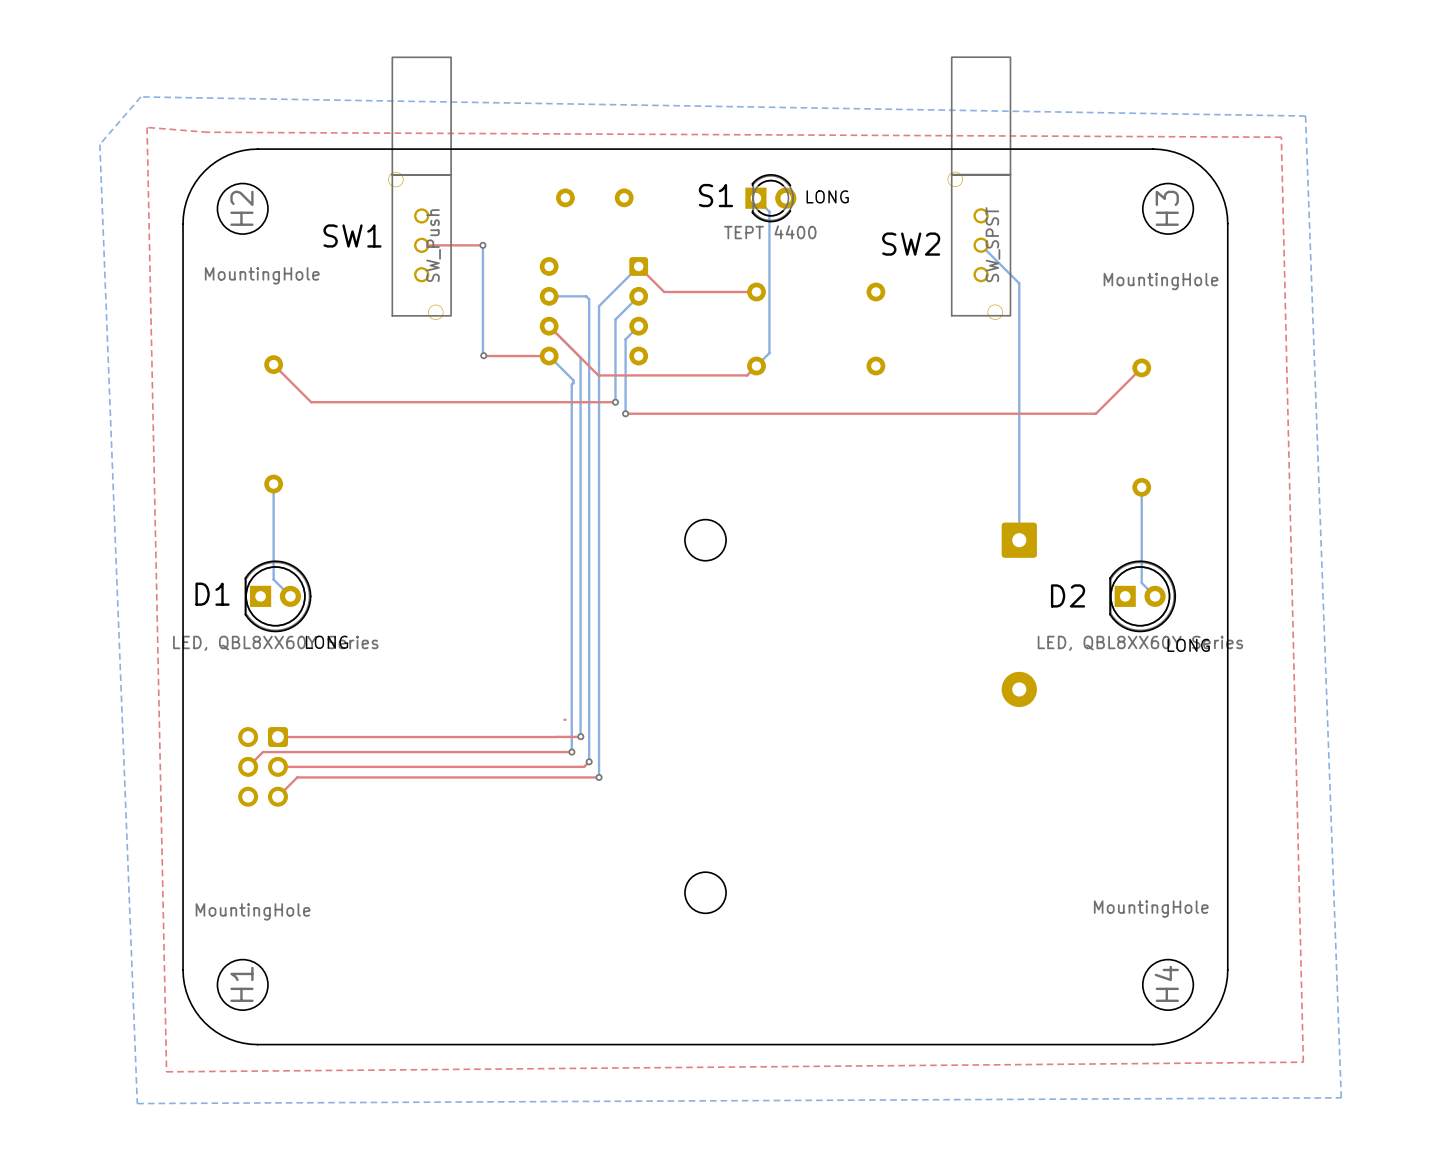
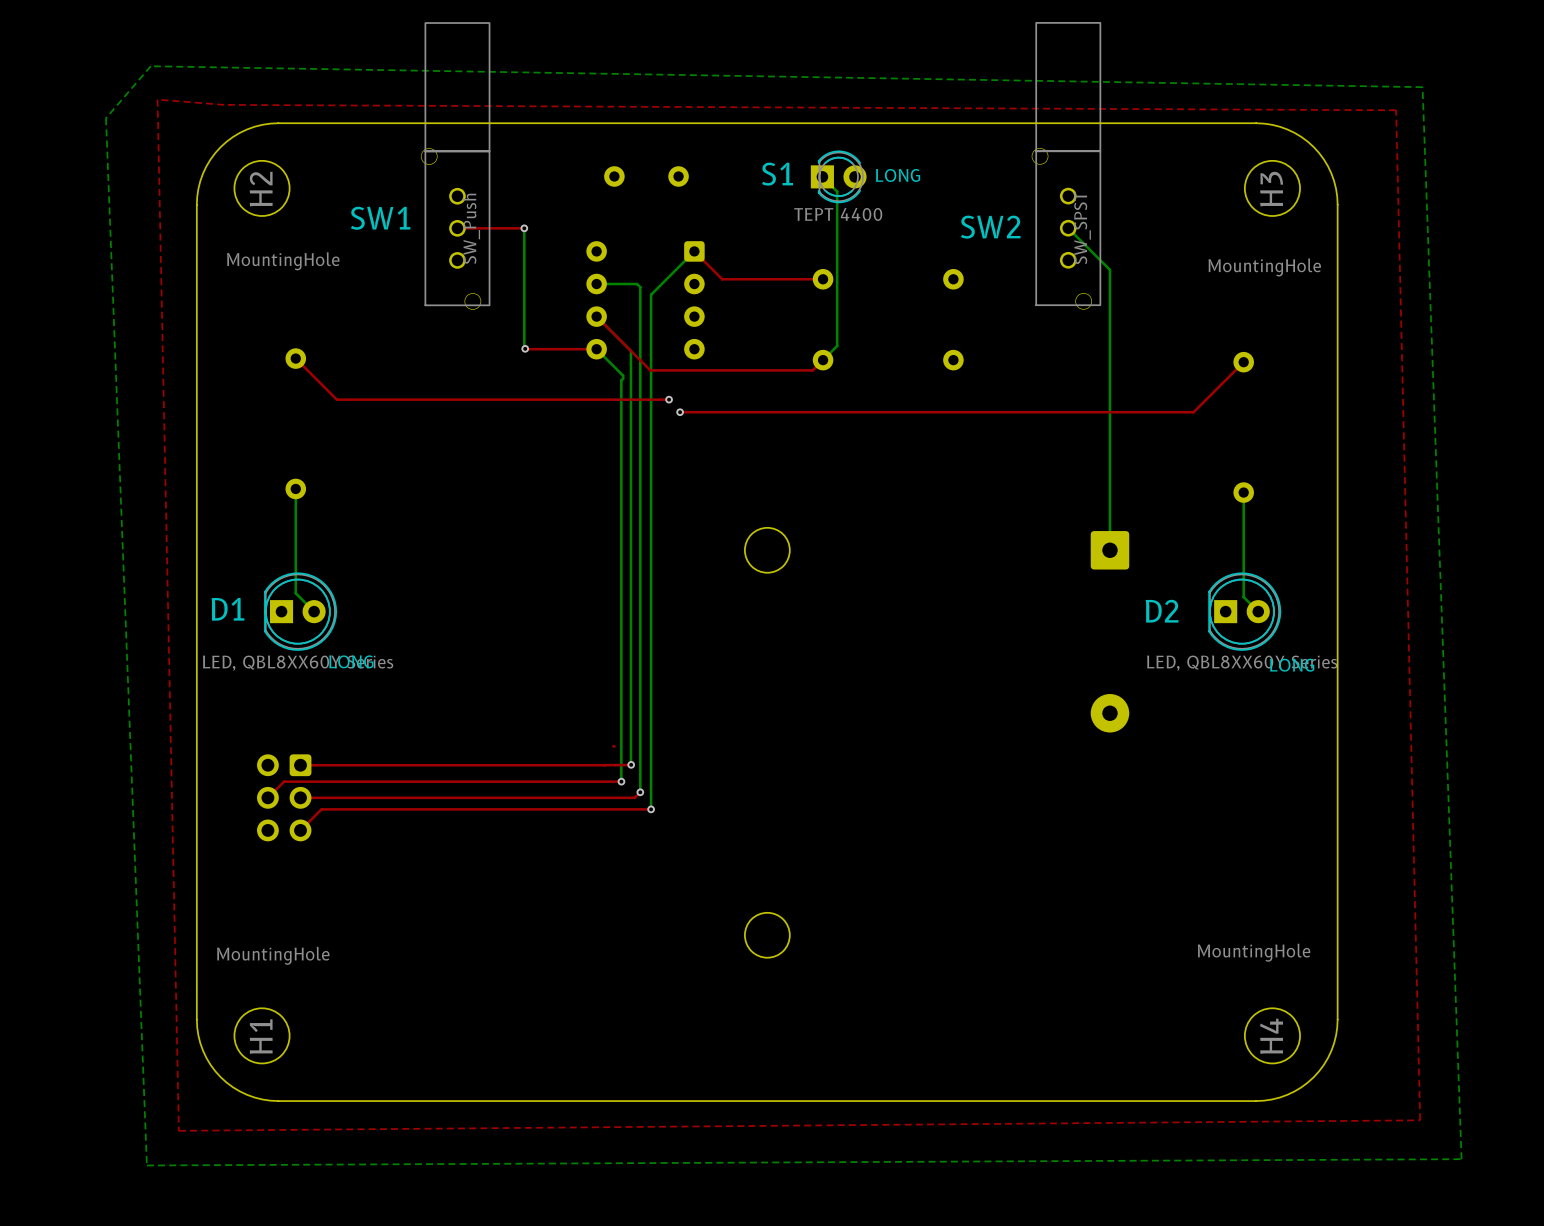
bottom track: (638, 296) (615, 319) (615, 402) -> none
bottom track: (638, 326) (625, 339) (625, 413) -> none

